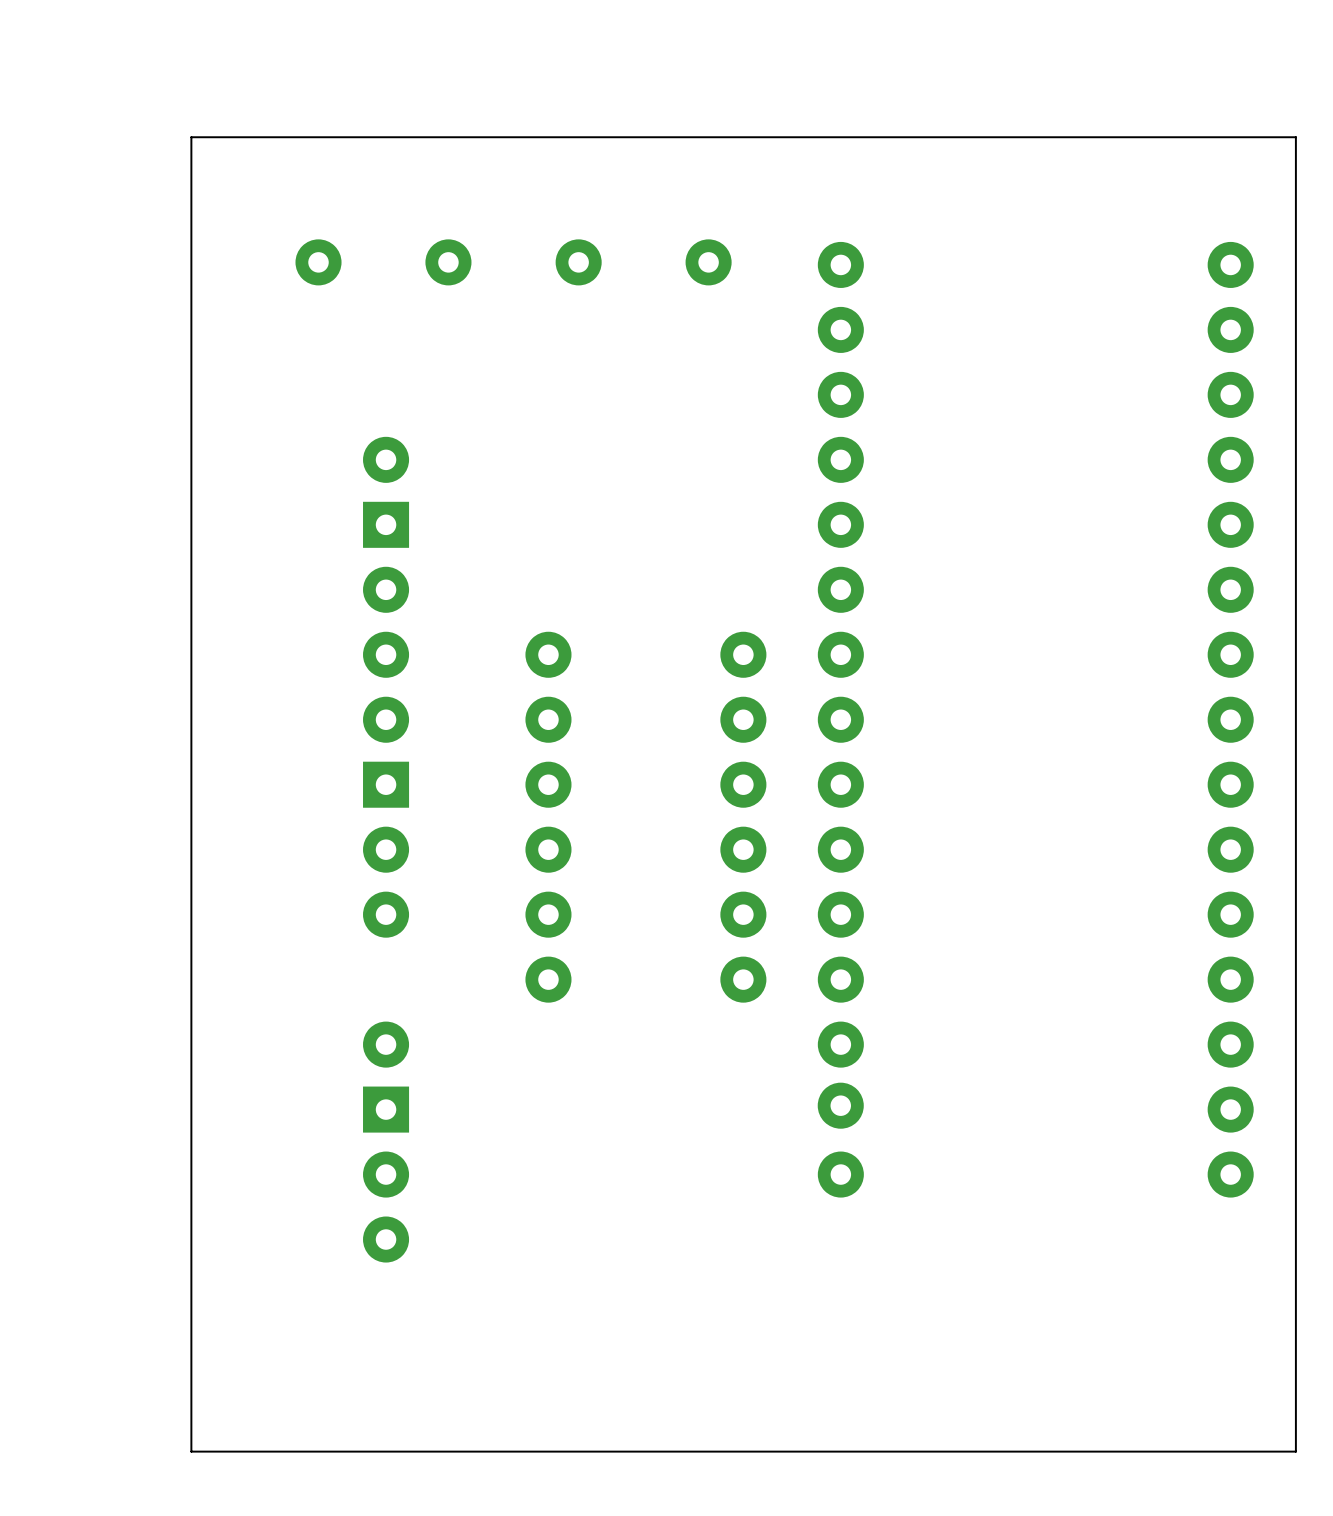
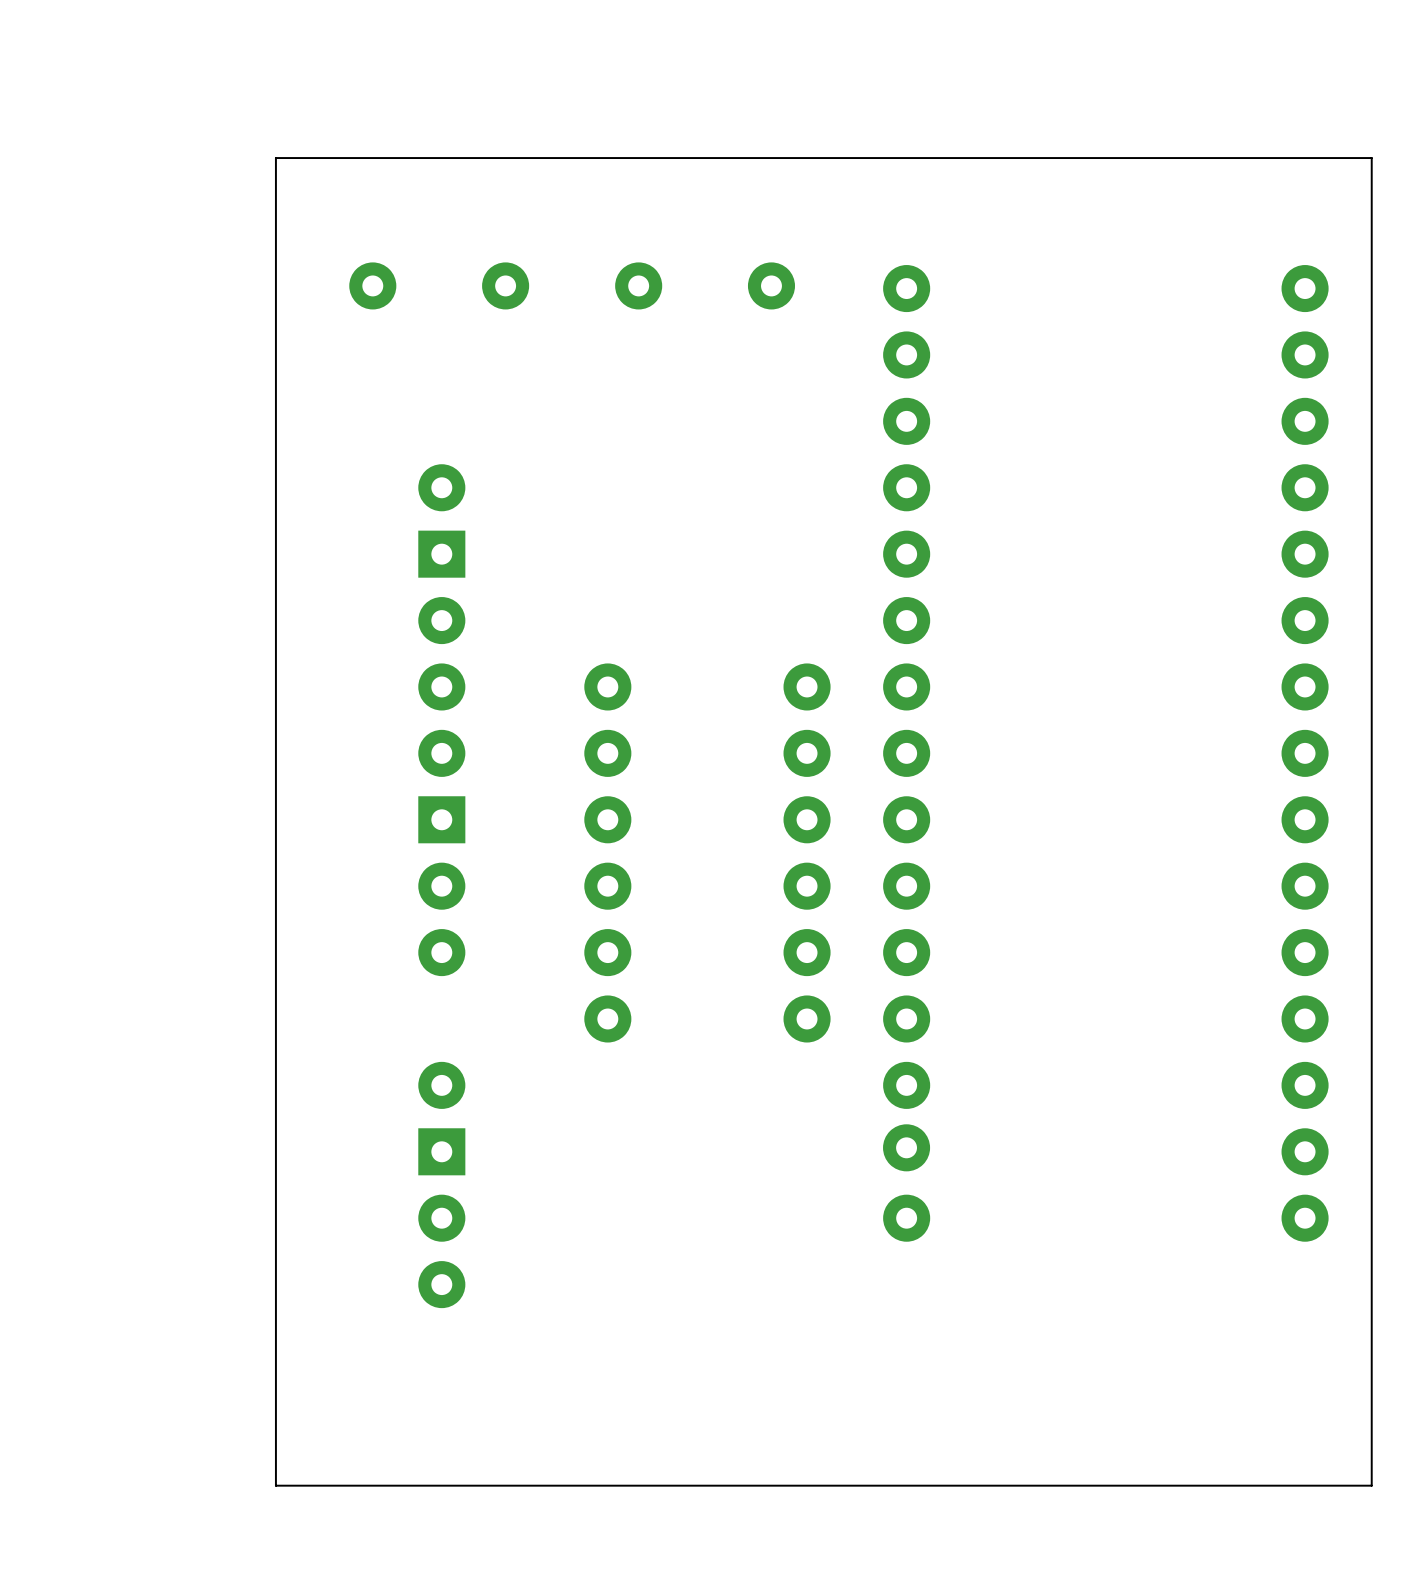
board edge: (223, 137) (191, 137) (191, 1451) (1295, 1451) (1295, 1436) -> (275, 158) (275, 1485) (1371, 1485)

